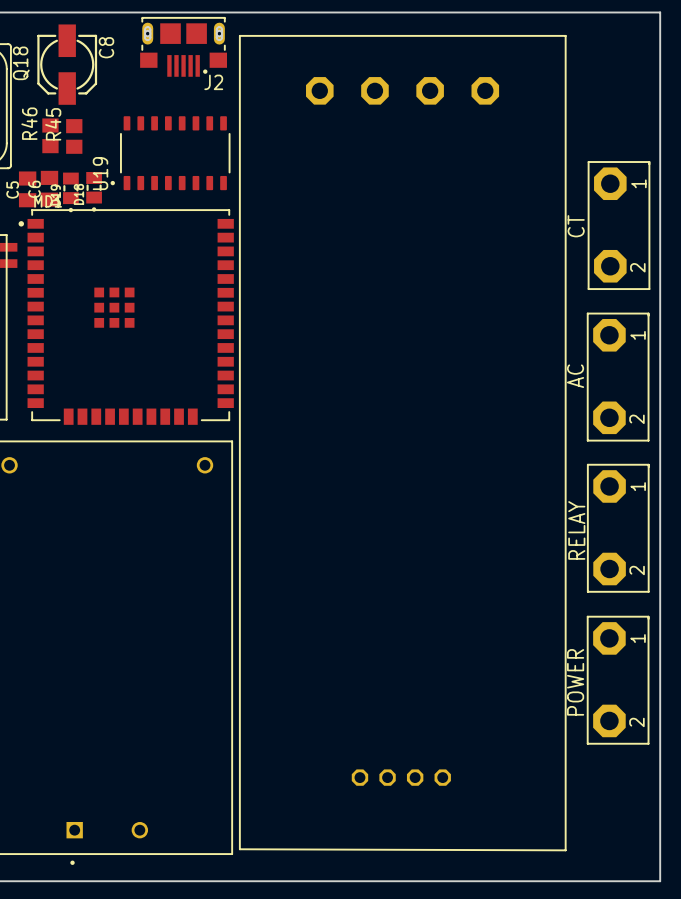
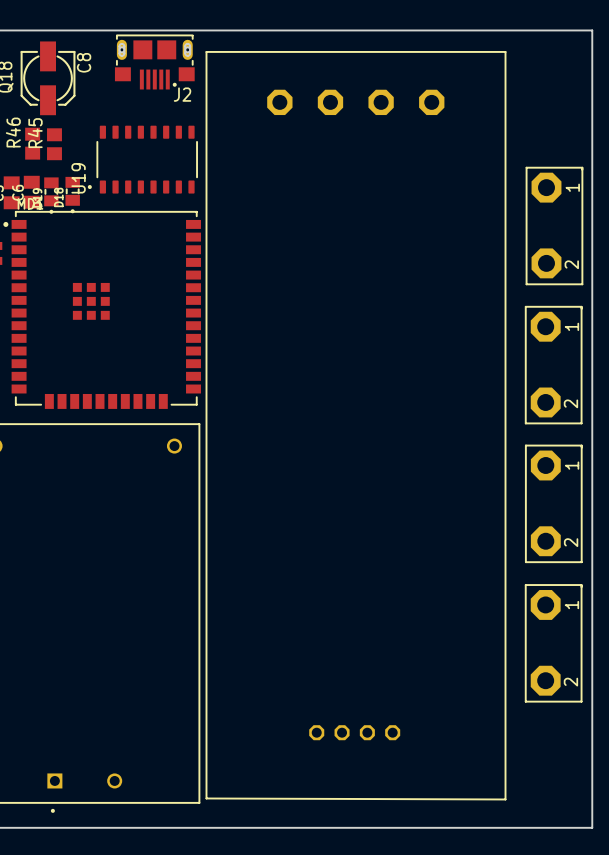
text: CT (576, 226) -> none
text: AC (575, 376) -> none
text: RELAY (576, 530) -> none
text: POWER (575, 682) -> none

